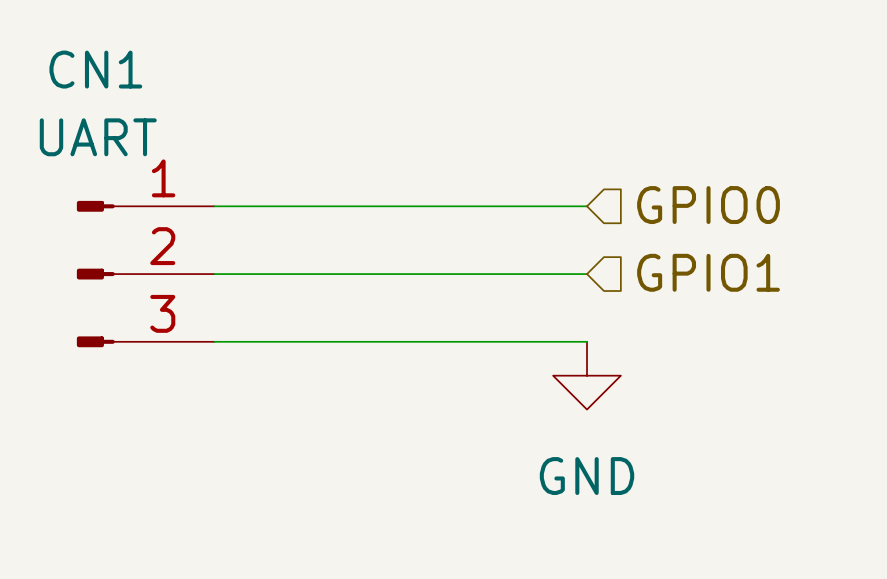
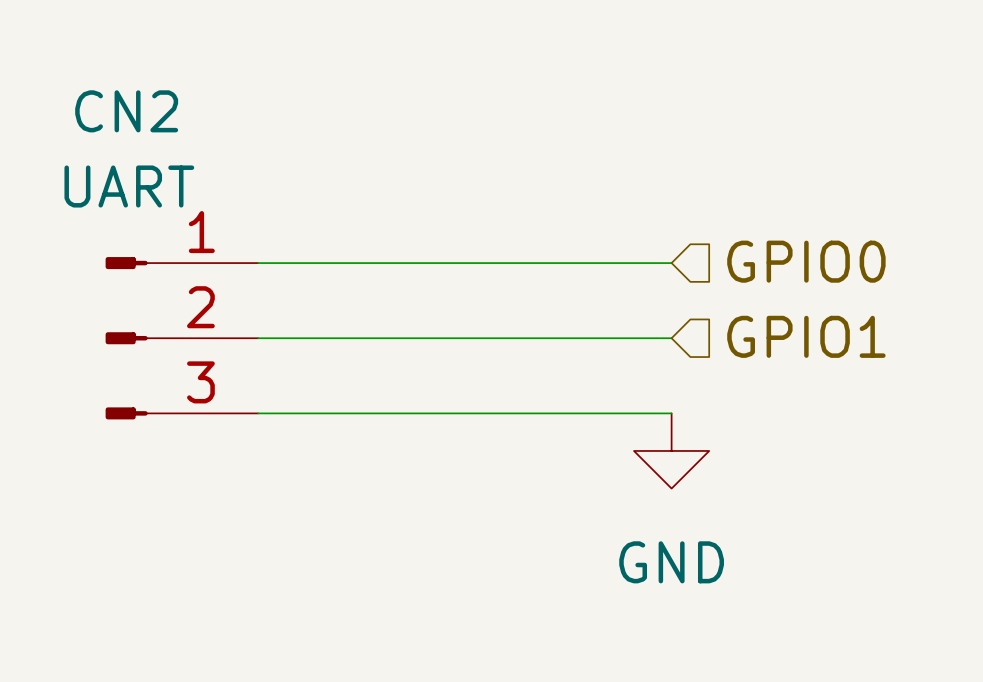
CN1 name: CN1 (95, 69) -> CN2 (126, 111)

